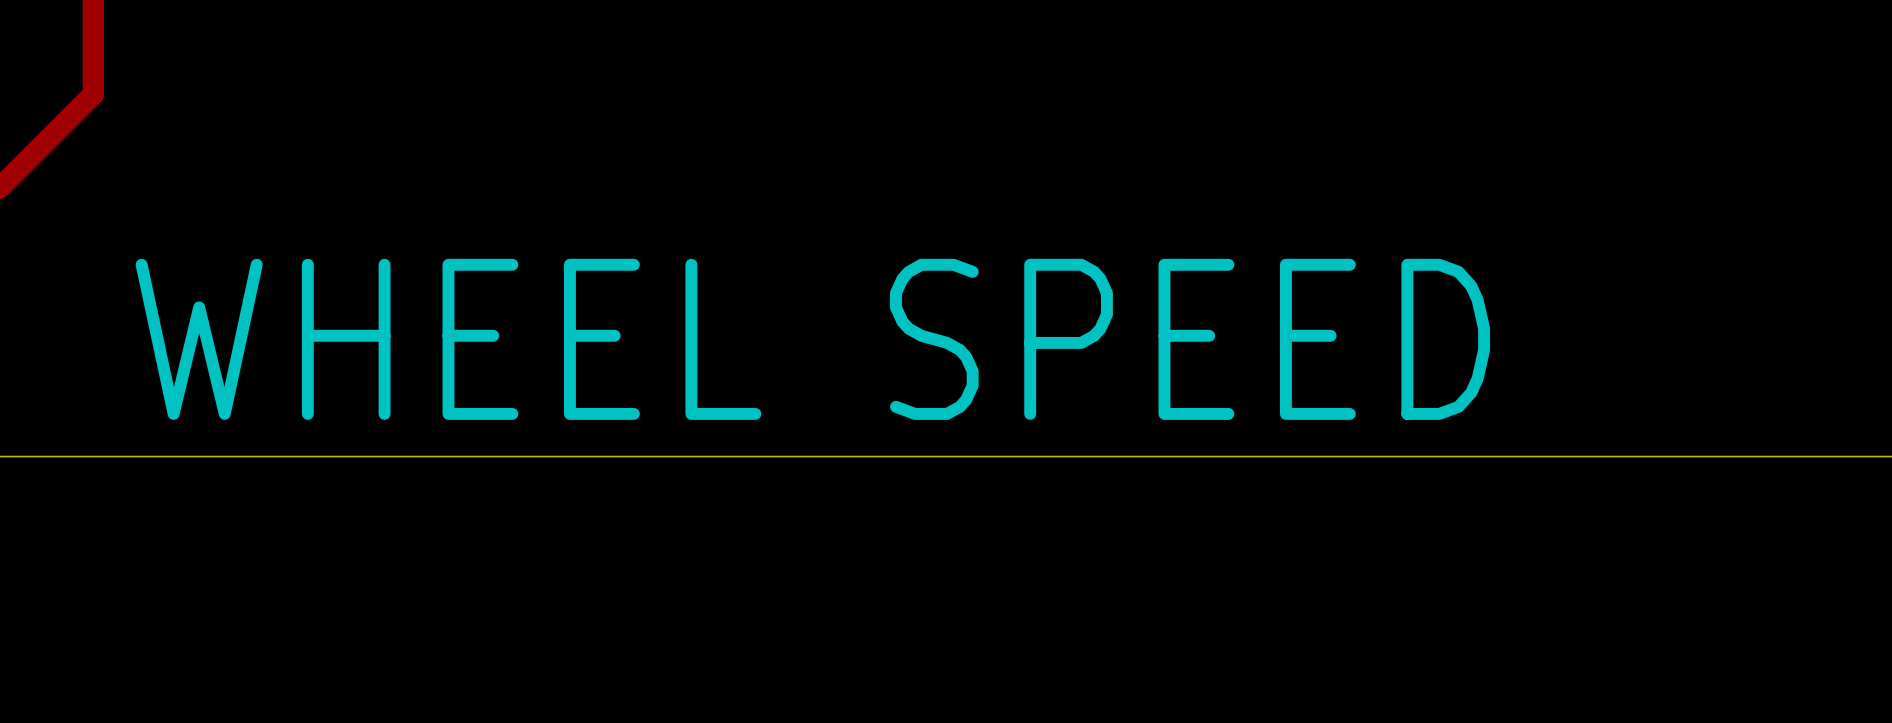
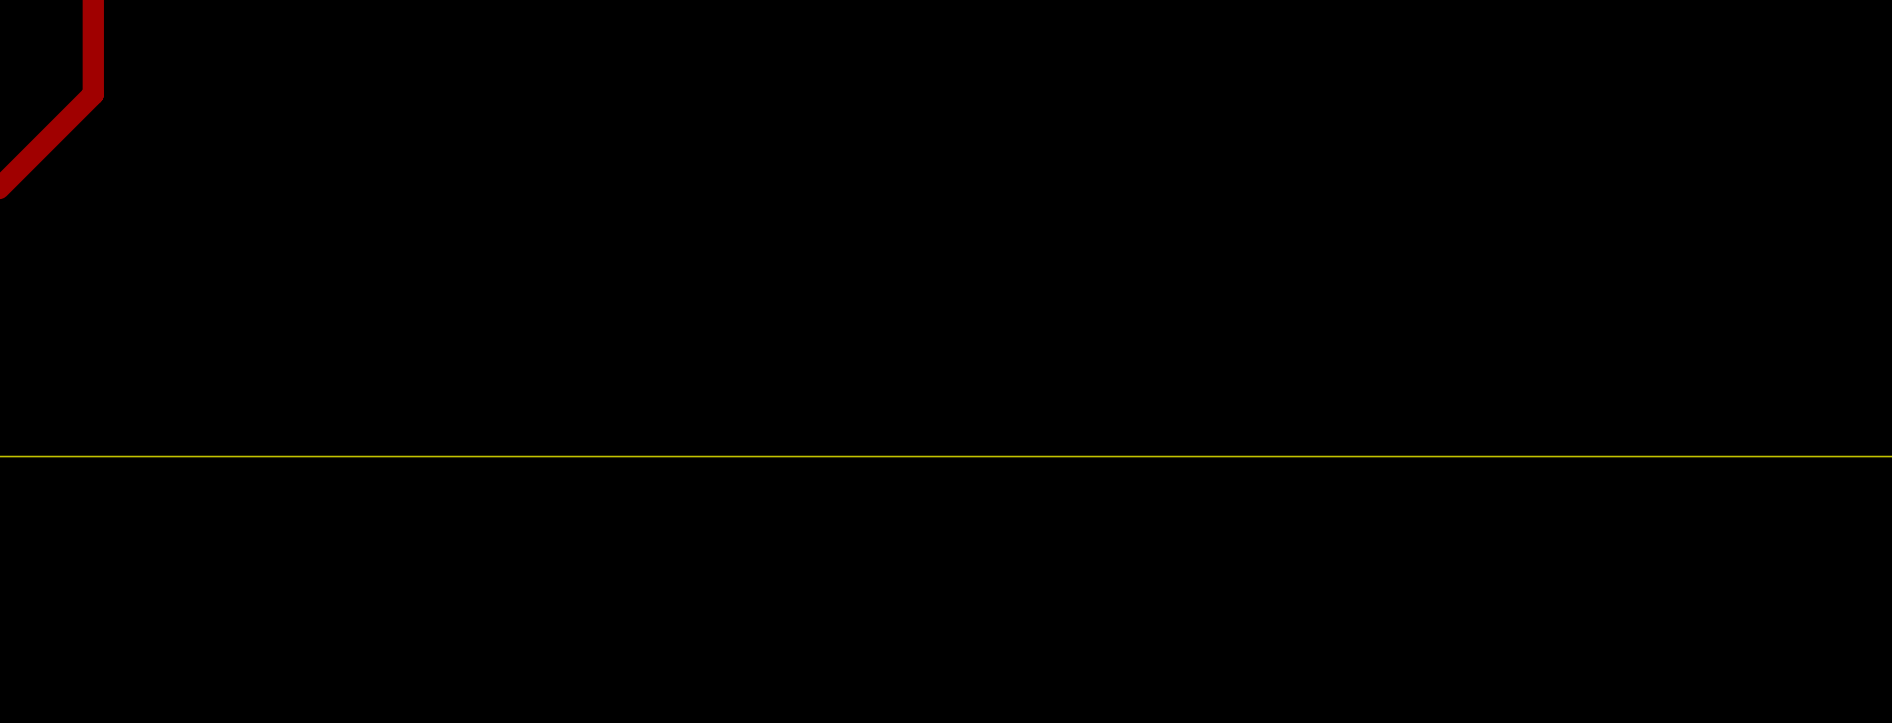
text: WHEEL SPEED (812, 339) -> none

